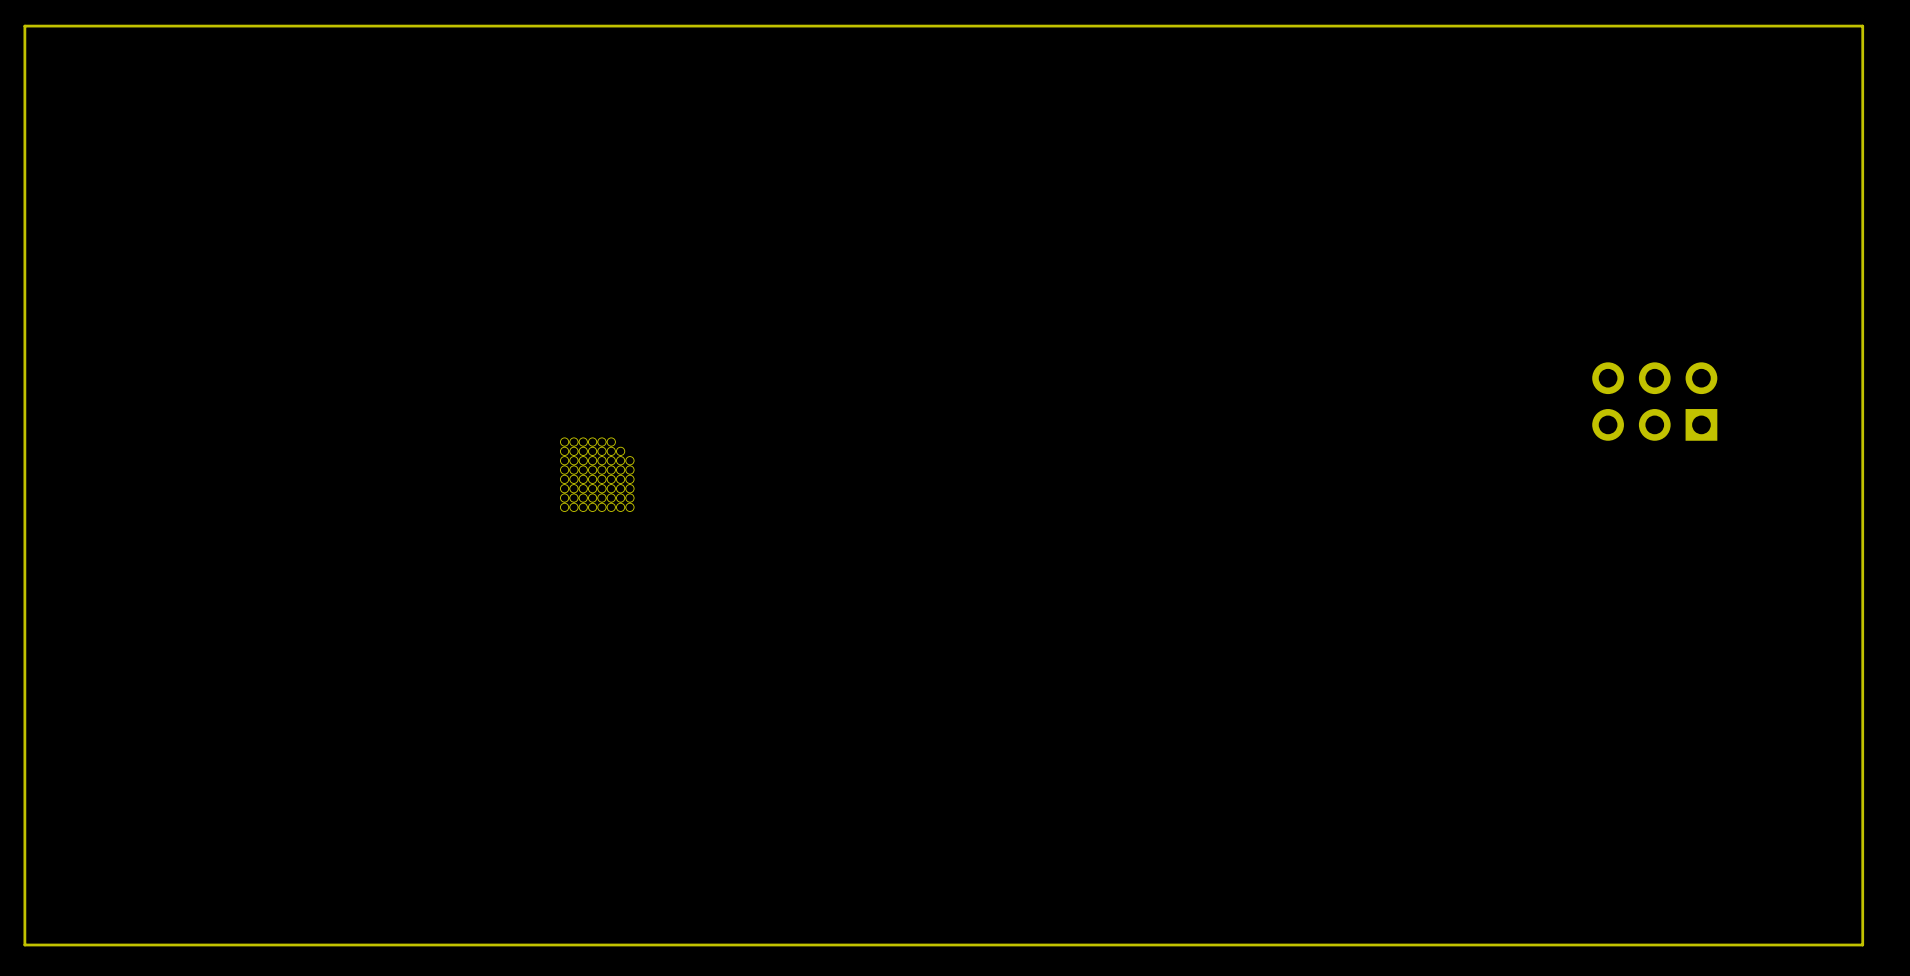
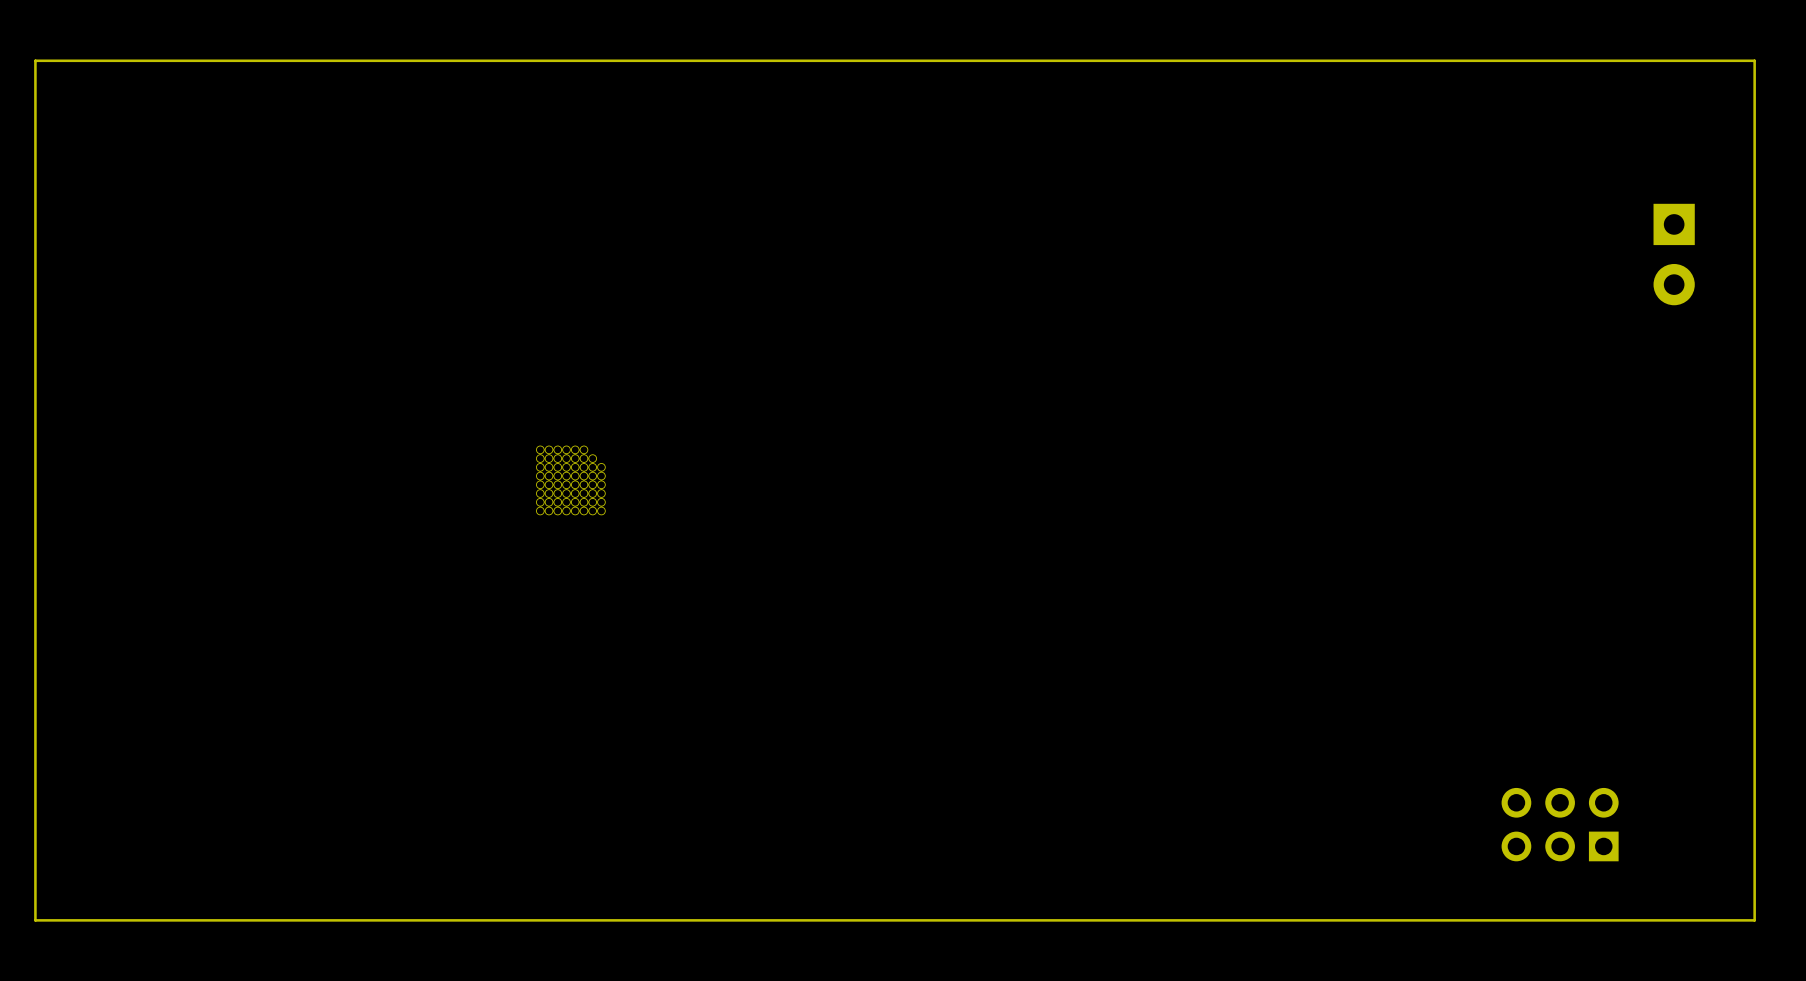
part: none -> (1674, 254)
part position: (1654, 401) -> (1560, 824)

